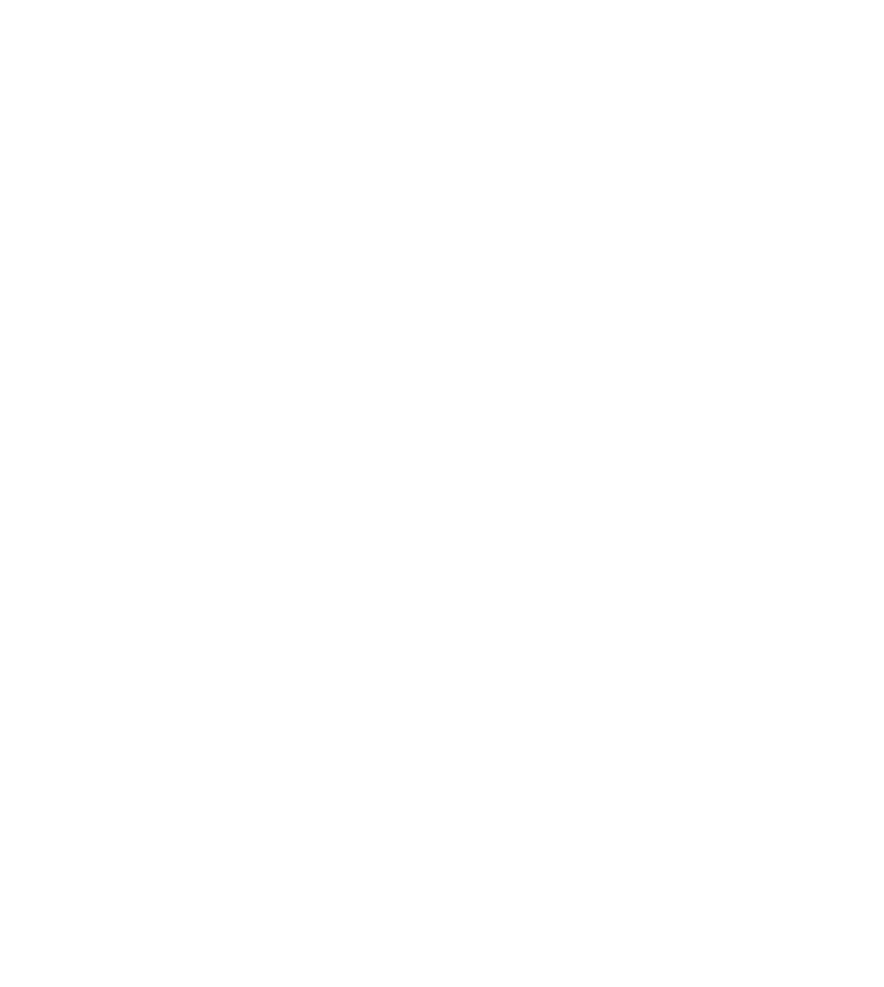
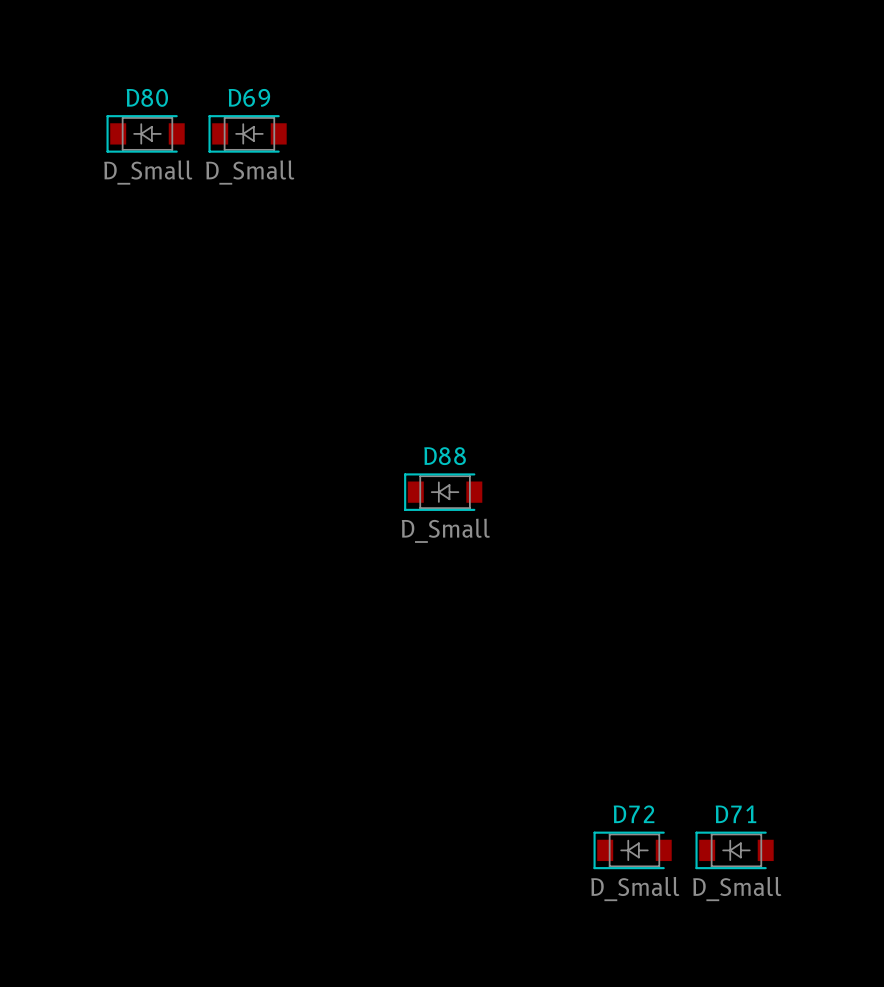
D80: none -> D_Small (145, 133)
D69: none -> D_Small (247, 133)
D88: none -> D_Small (443, 492)
D72: none -> D_Small (632, 850)
D71: none -> D_Small (734, 850)

